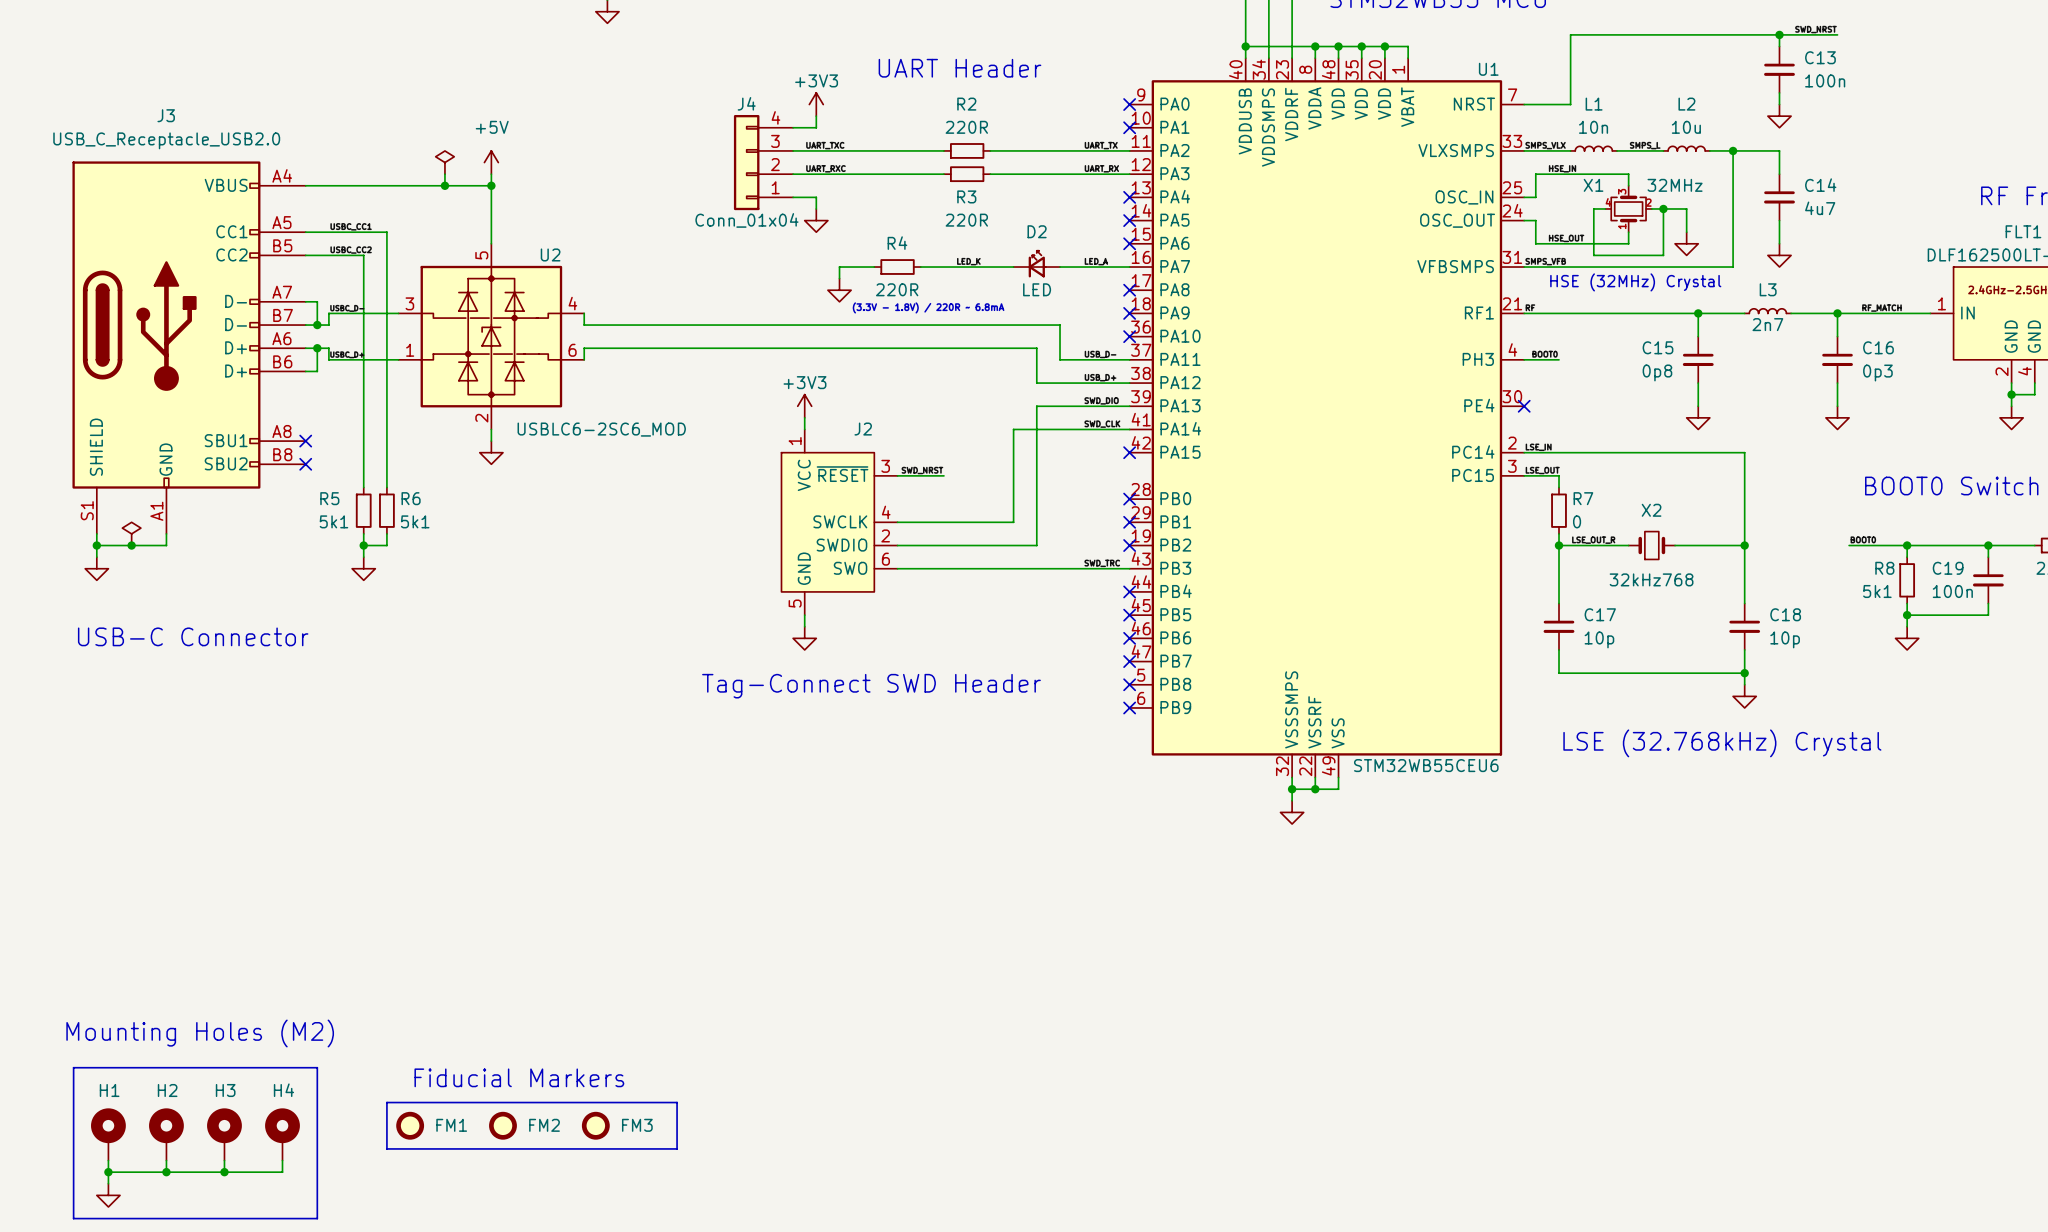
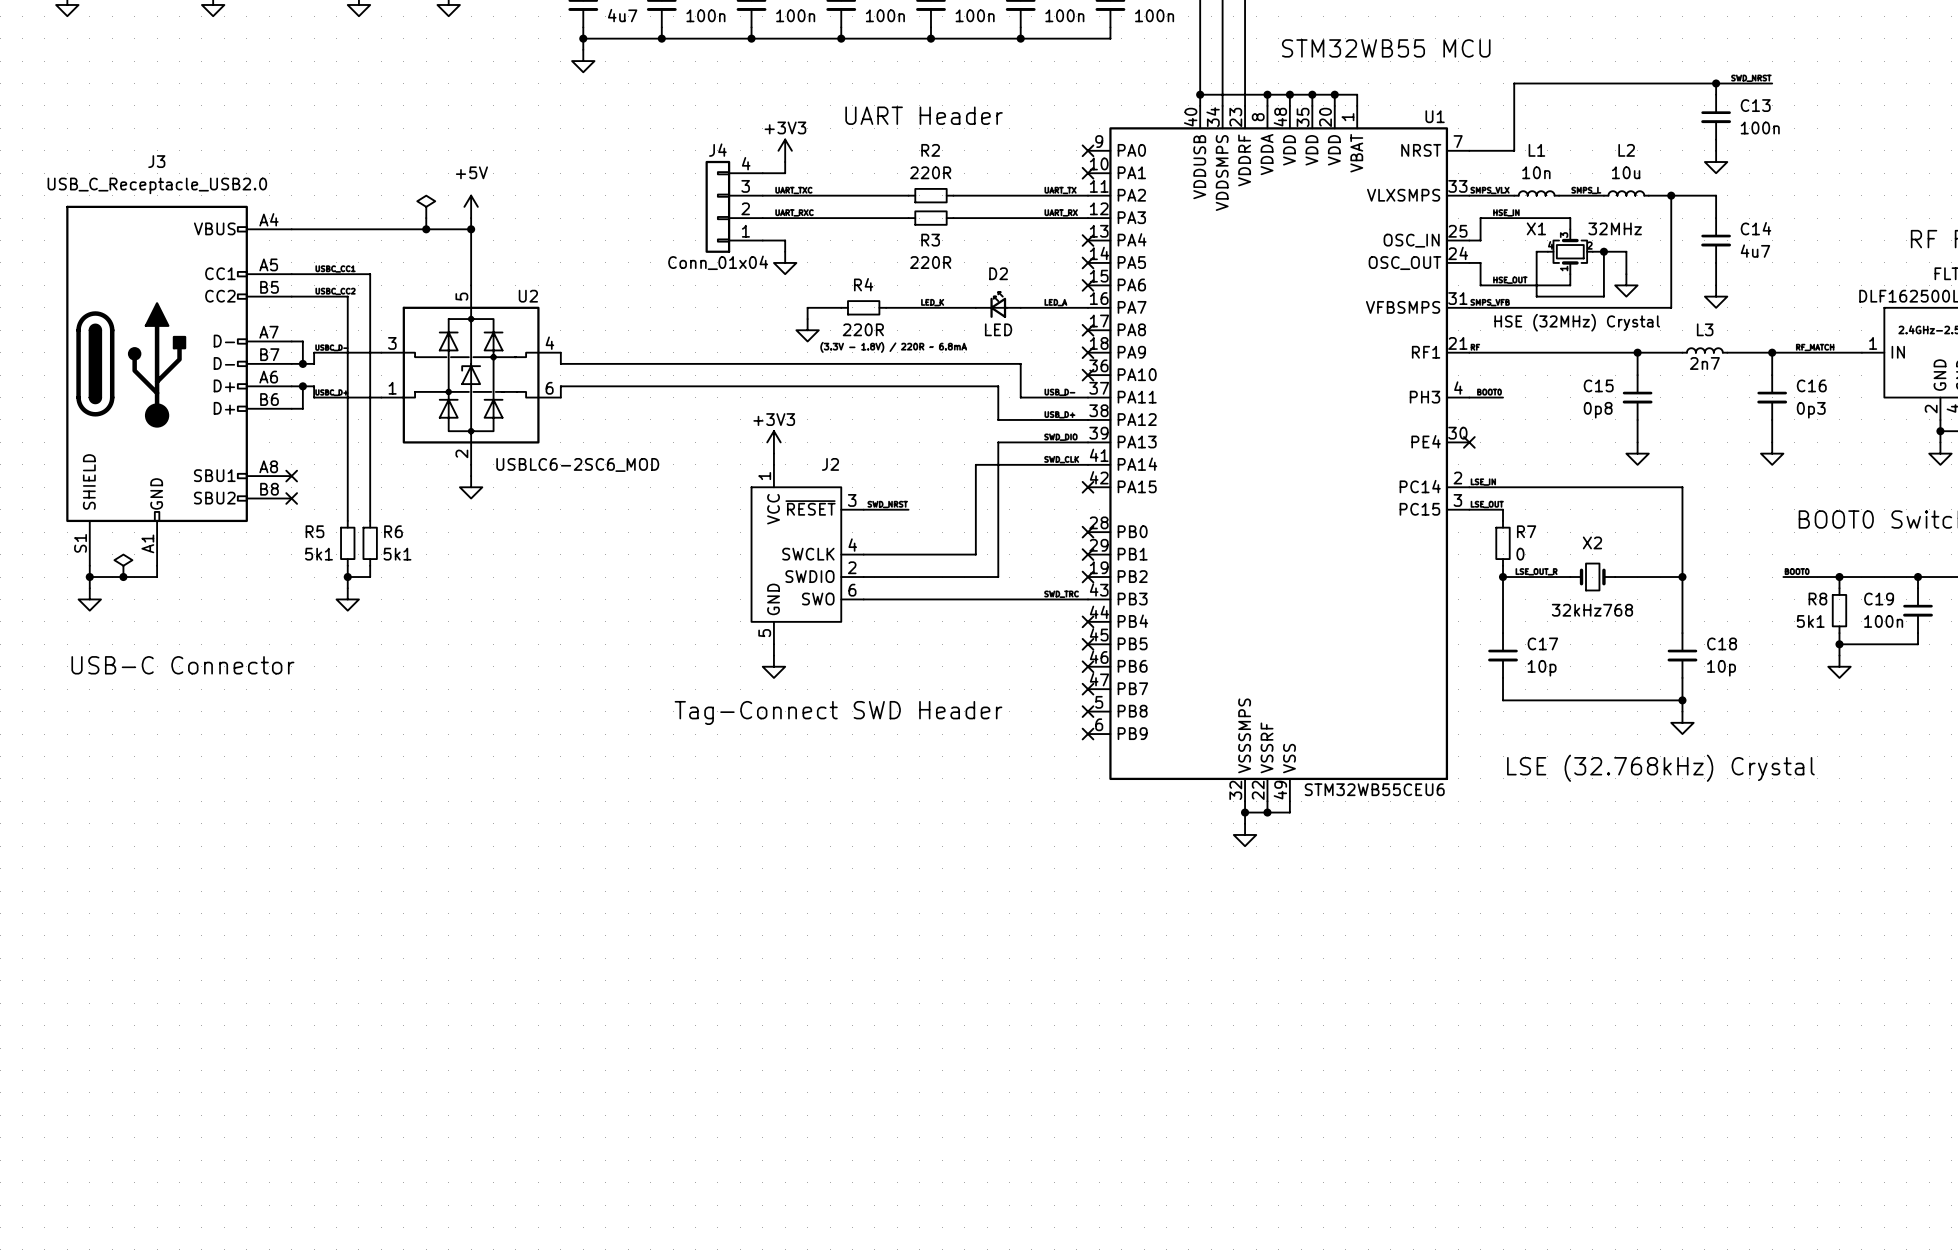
text: Mounting Holes (M2) (200, 1033) -> none
line: (73, 1067) (317, 1067) (317, 1218) (73, 1218) (73, 1067) -> none
text: Fiducial Markers (519, 1077) -> none
line: (386, 1102) (677, 1102) (677, 1148) (386, 1148) (386, 1102) -> none
FM1: (410, 1125) -> none
FM2: (502, 1125) -> none
FM3: (595, 1125) -> none
H1: (108, 1134) -> none
H2: (166, 1134) -> none
H3: (224, 1134) -> none
H4: (282, 1134) -> none
wire: (108, 1160) (108, 1183) -> none
wire: (166, 1160) (166, 1172) -> none
wire: (224, 1160) (224, 1172) -> none
wire: (282, 1160) (282, 1172) (108, 1172) -> none
junction: (108, 1172) -> none
junction: (166, 1172) -> none
junction: (224, 1172) -> none
power symbol: (108, 1195) -> none

